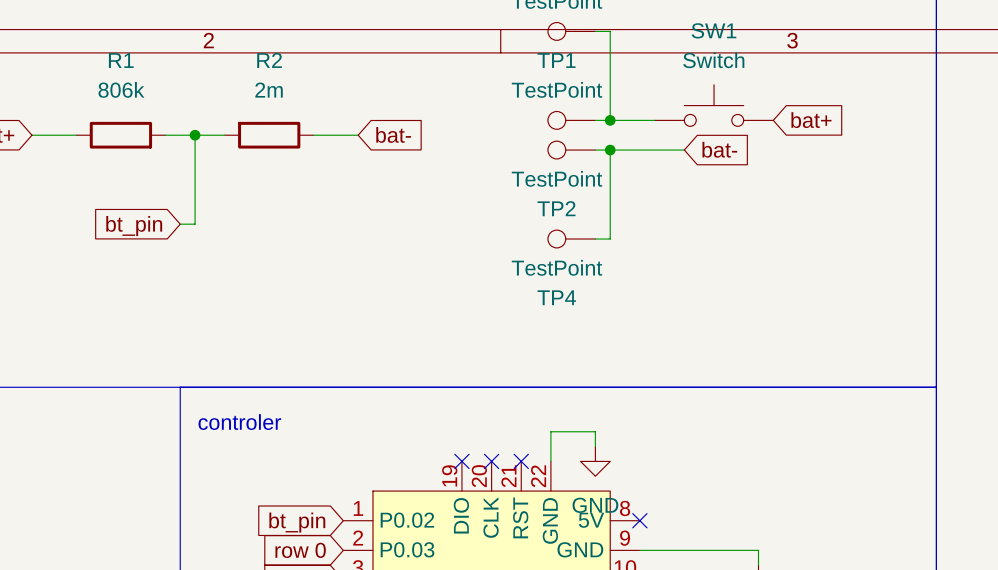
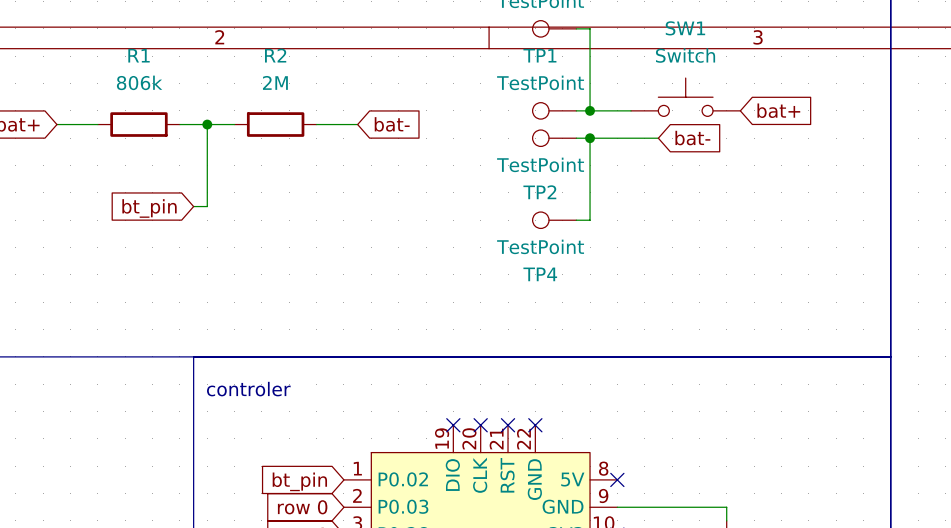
R2 value: 2m (269, 90) -> 2M (275, 82)
wire: (595, 446) (595, 431) (550, 431) (550, 461) -> none
no-connect mark: none -> (535, 425)
power symbol: GND (595, 461) -> none

